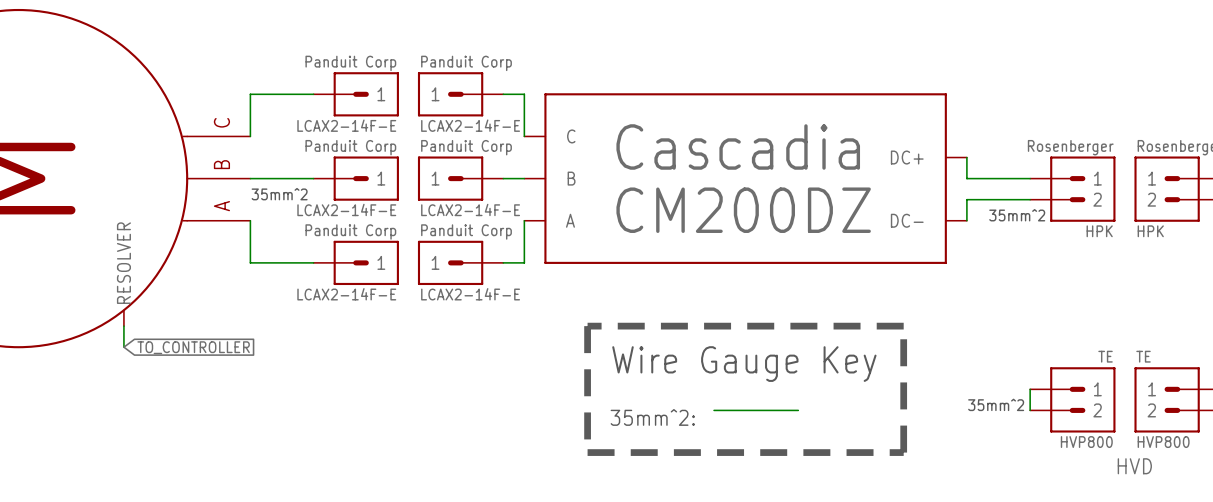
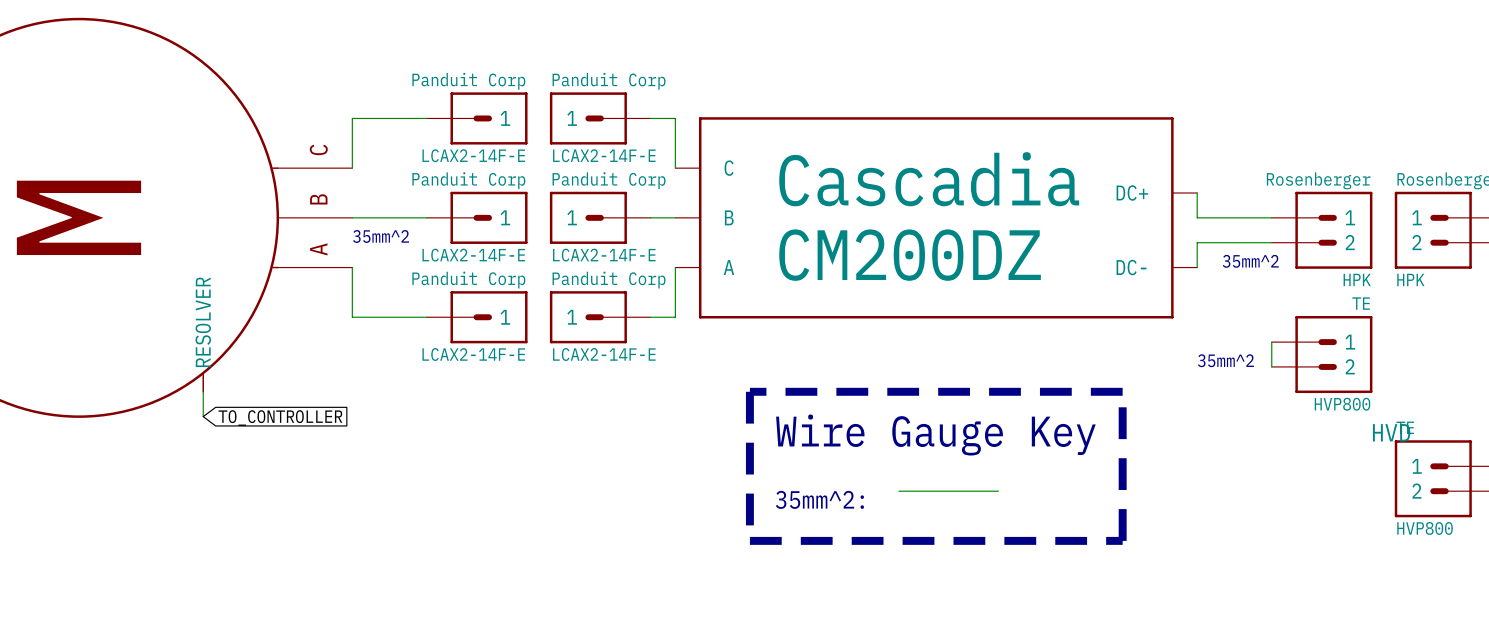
wire: (1030, 389) (1030, 410) -> (1271, 342) (1271, 366)
part position: (1072, 399) -> (1322, 354)
text position: 35mm^2 (996, 404) -> 35mm^2 (1225, 360)
text position: HVD (1134, 466) -> HVD (1391, 432)

